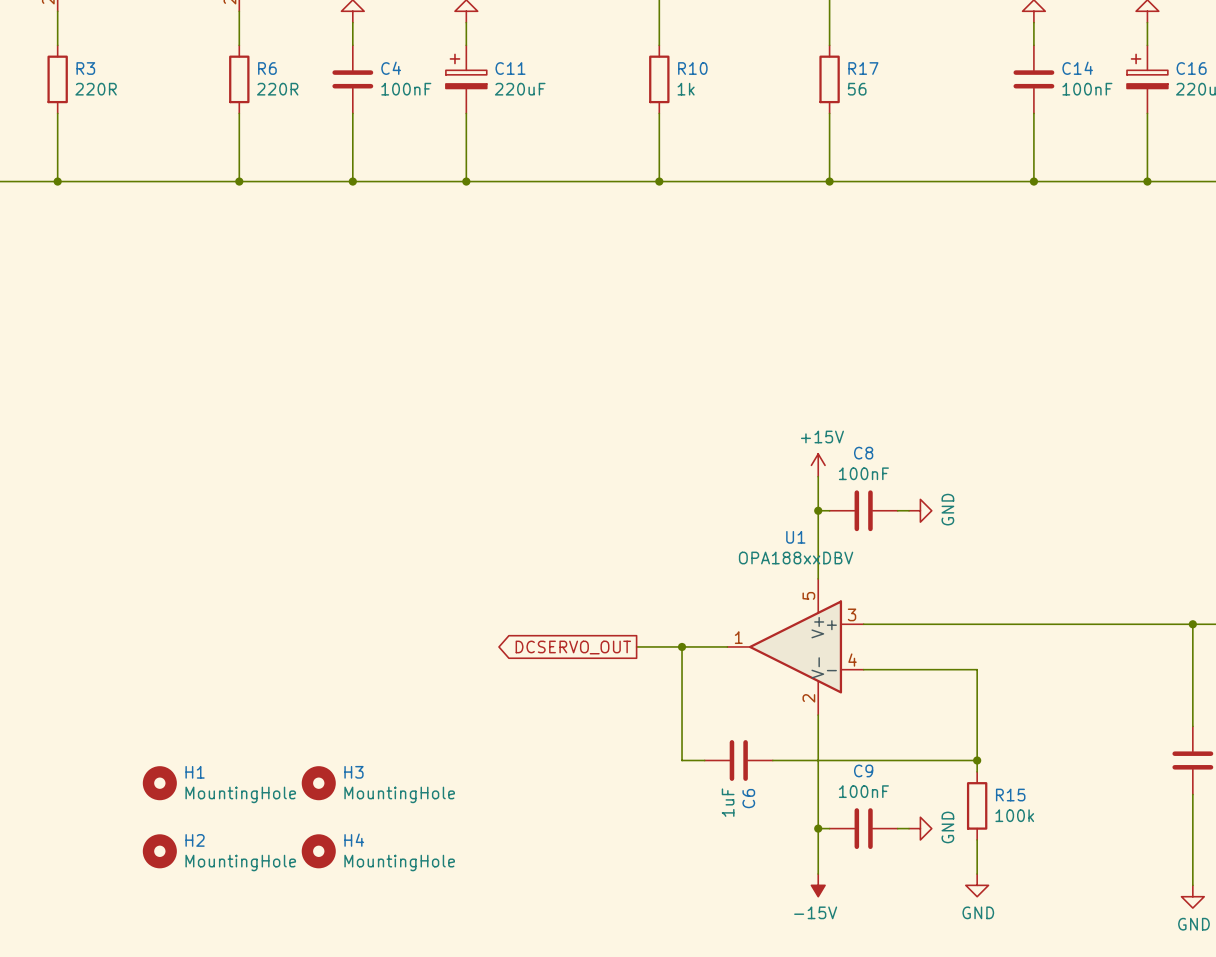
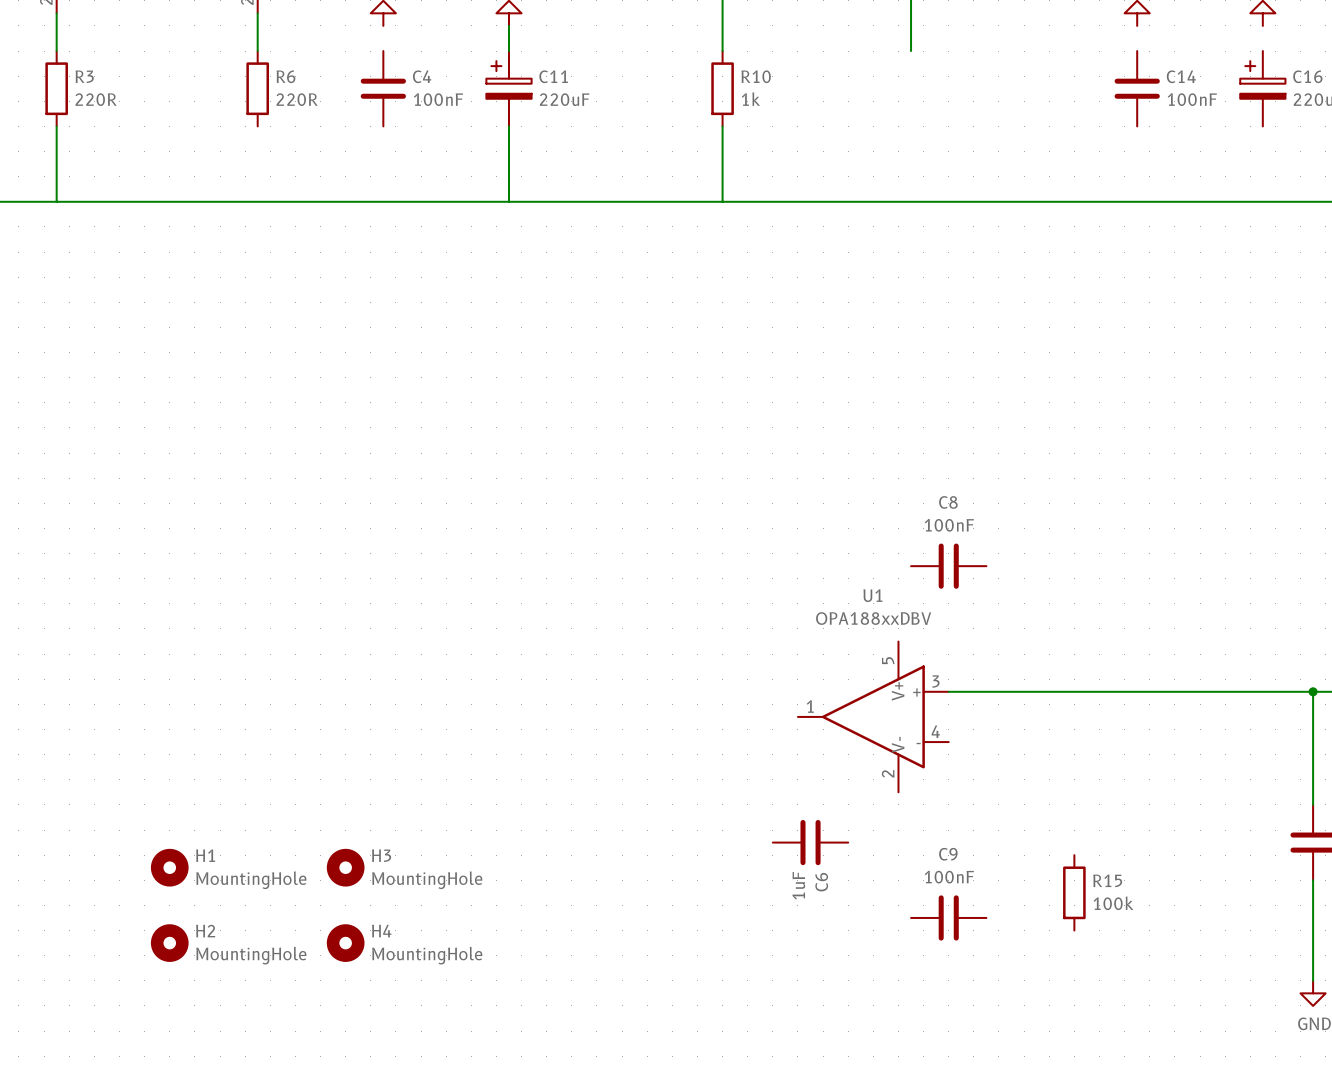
wire: (352, 22) (352, 45) -> none
wire: (1033, 22) (1033, 45) -> none
wire: (1147, 22) (1147, 45) -> none
R17: 56 (829, 79) -> none
wire: (239, 113) (239, 181) -> none
wire: (352, 113) (352, 181) -> none
wire: (829, 113) (829, 181) -> none
wire: (1033, 113) (1033, 181) -> none
wire: (1147, 113) (1147, 181) -> none
junction: (57, 181) -> none
junction: (239, 181) -> none
junction: (352, 181) -> none
junction: (466, 181) -> none
junction: (659, 181) -> none
junction: (829, 181) -> none
junction: (1033, 181) -> none
junction: (1147, 181) -> none
power symbol: +15V (818, 465) -> none
wire: (818, 476) (818, 578) -> none
wire: (818, 510) (829, 510) -> none
junction: (818, 510) -> none
wire: (897, 510) (909, 510) -> none
power symbol: GND (920, 510) -> none
wire: (636, 646) (727, 646) -> none
wire: (682, 646) (682, 760) (704, 760) -> none
junction: (682, 646) -> none
global label: DCSERVO_OUT (573, 647) -> none
wire: (863, 669) (977, 669) (977, 771) -> none
wire: (818, 715) (818, 874) -> none
wire: (772, 760) (977, 760) -> none
junction: (977, 760) -> none
wire: (818, 828) (829, 828) -> none
junction: (818, 828) -> none
wire: (897, 828) (909, 828) -> none
power symbol: GND (920, 828) -> none
wire: (977, 839) (977, 874) -> none
power symbol: -15V (818, 885) -> none
power symbol: GND (977, 885) -> none

